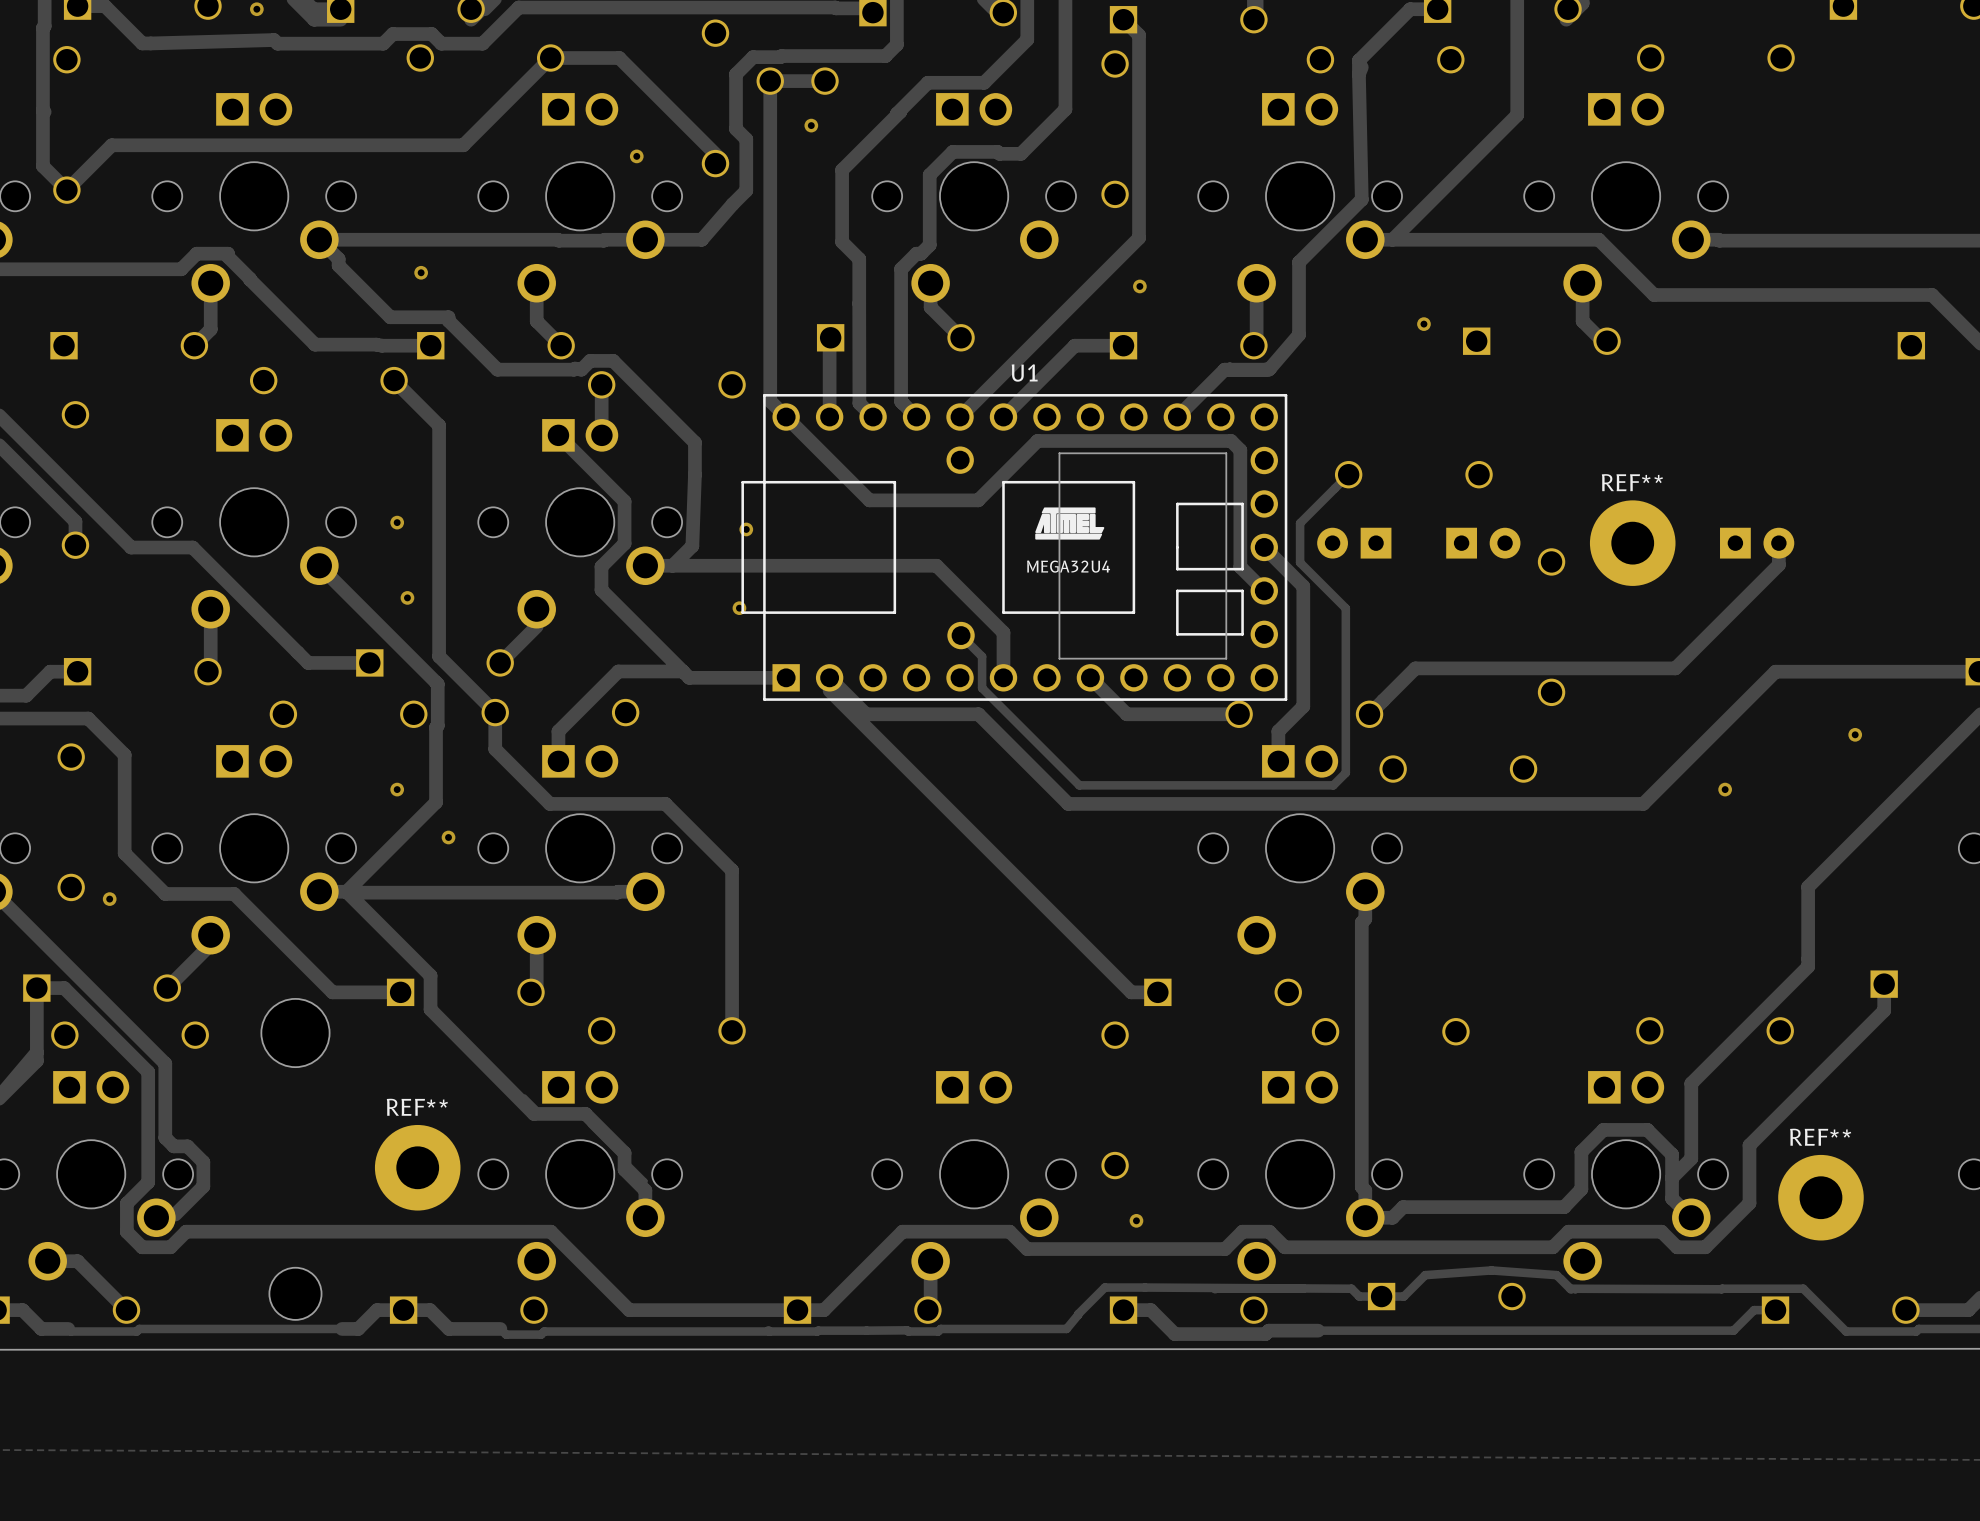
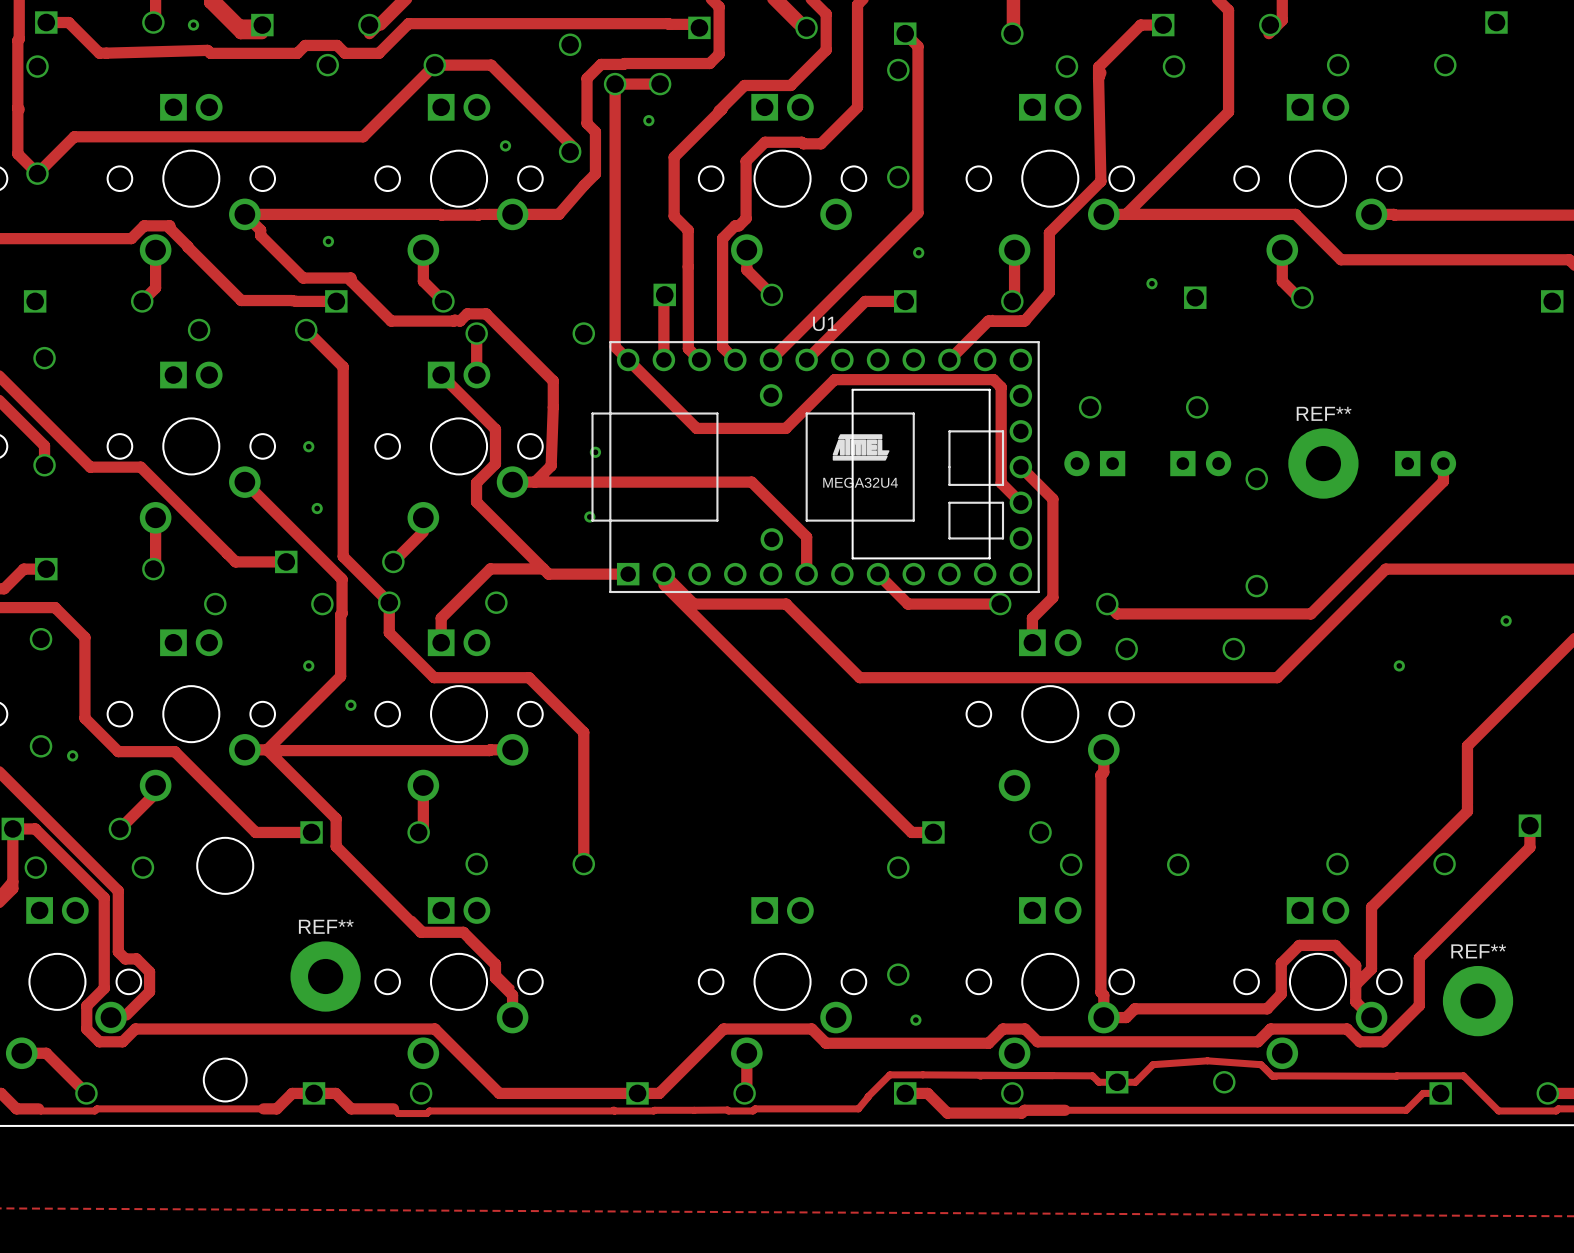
track: (1348, 474) (1300, 523) (1300, 562) (1345, 608) (1345, 772) (1333, 785) (1079, 785) (982, 688) (982, 656) (961, 635) -> none
track: (1675, 668) (1415, 668) (1369, 714) -> (1358, 566) (1310, 613) (1117, 613) (1107, 604)
track: (1775, 671) (1643, 803) (1576, 803) -> (1440, 569) (1385, 569) (1277, 677)

